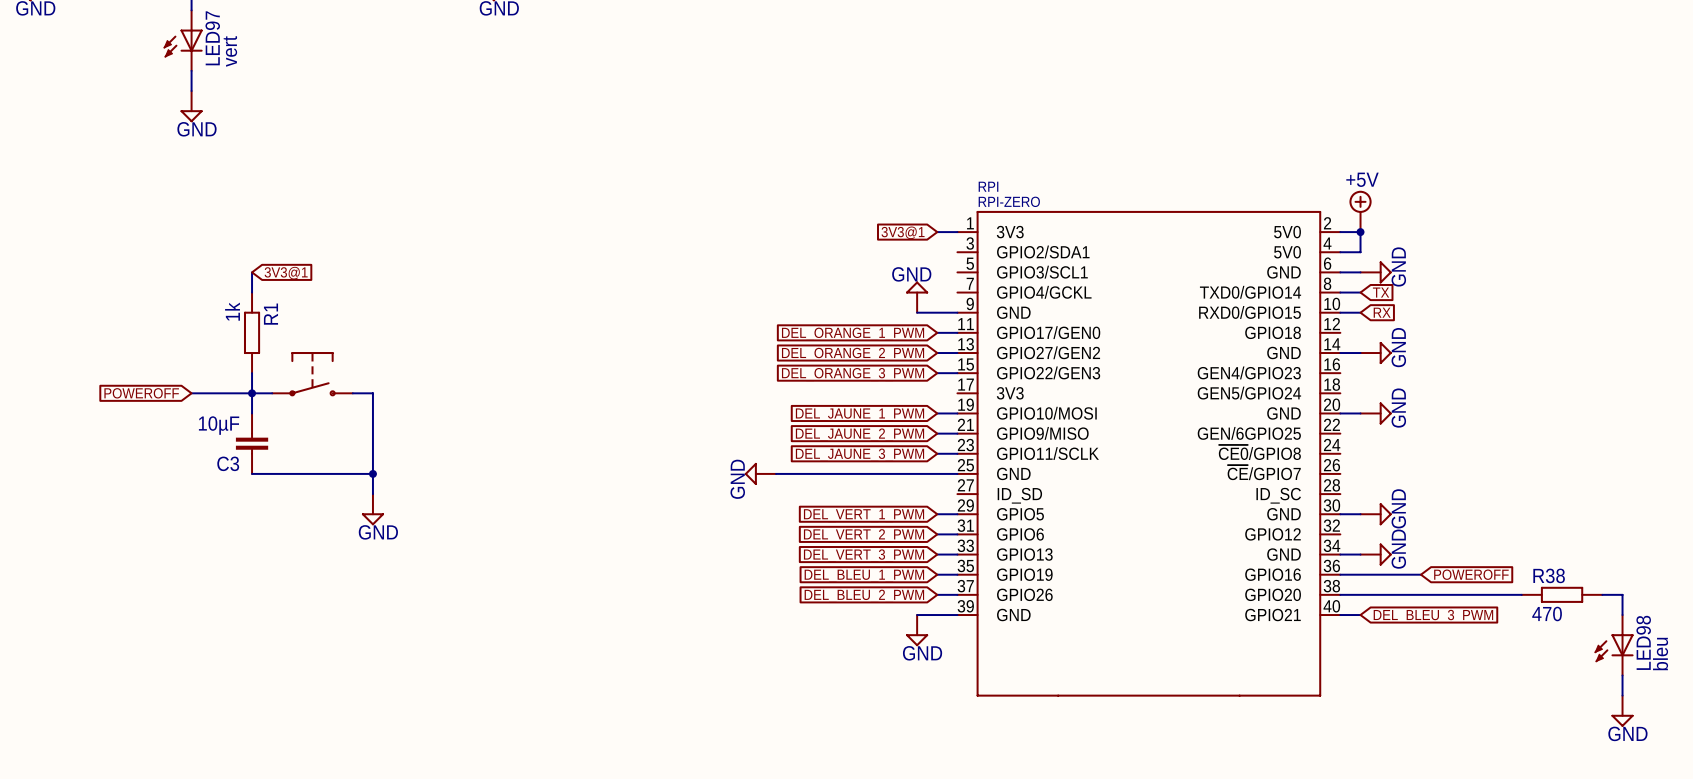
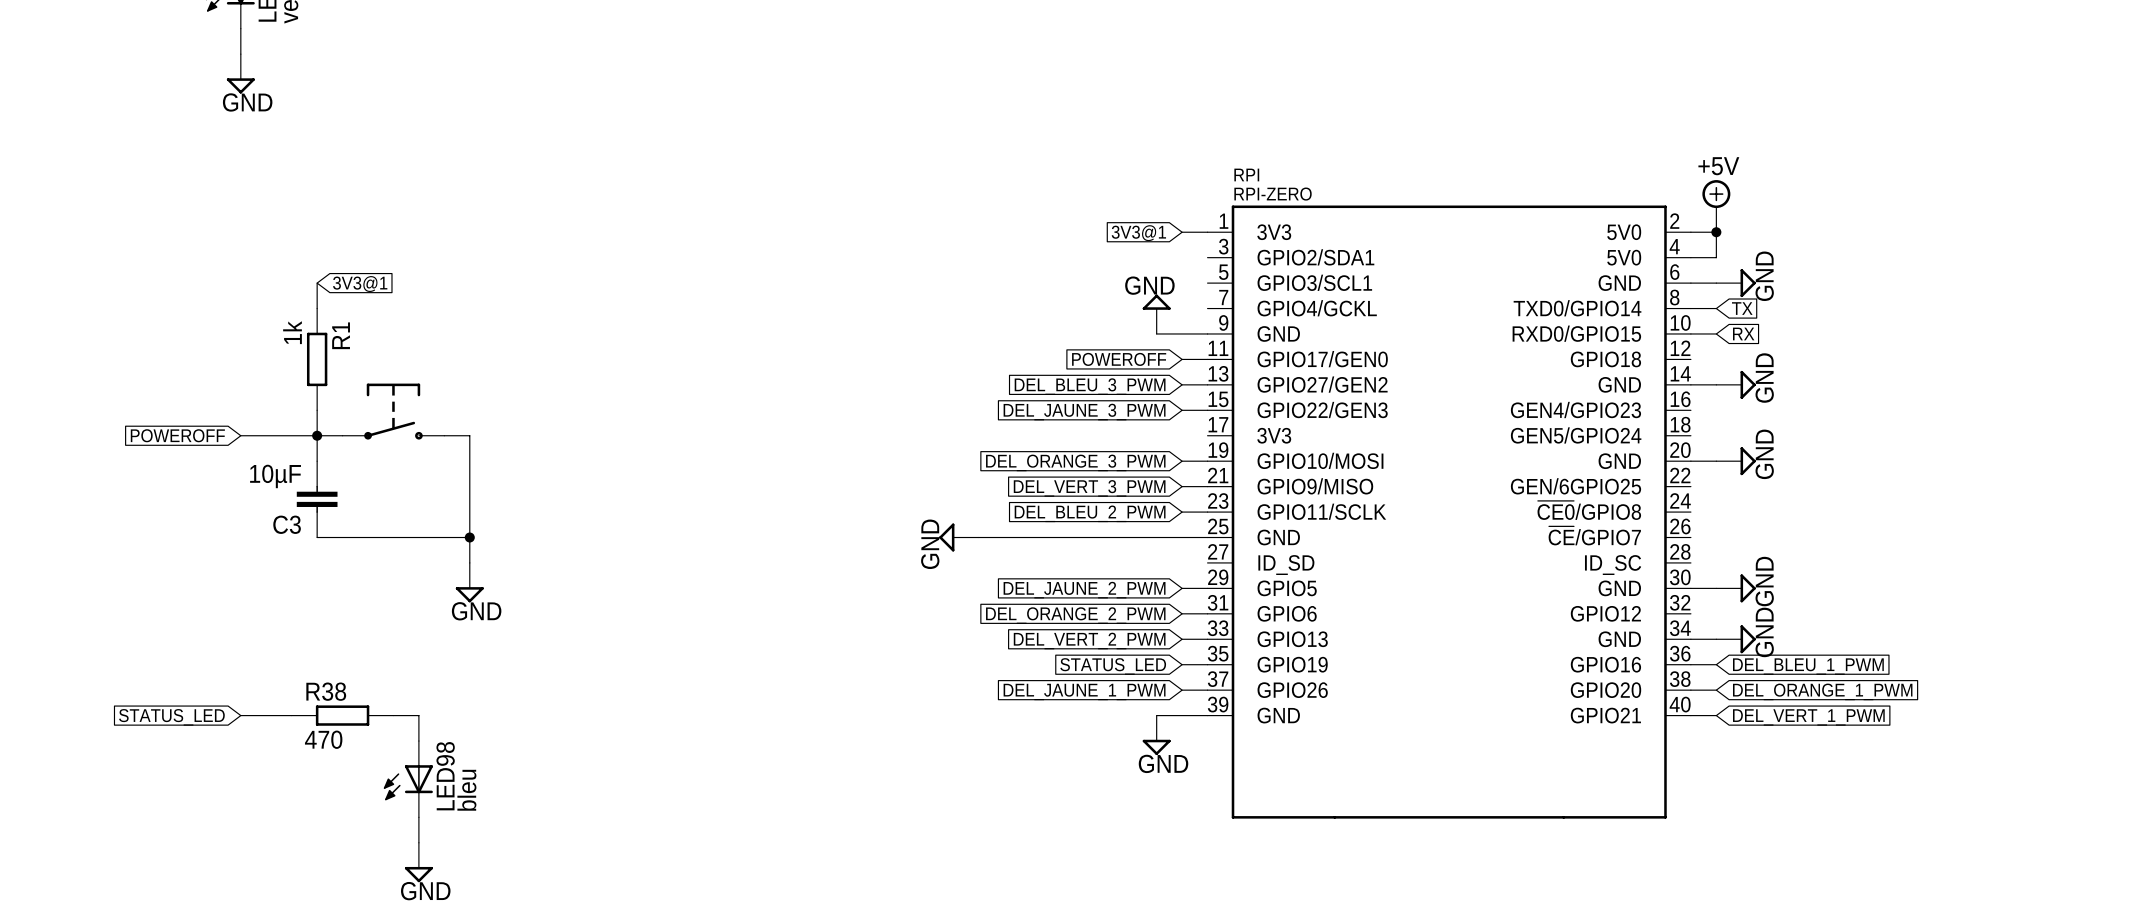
global label: DEL_ORANGE_1_PWM (853, 334) -> POWEROFF (1119, 359)
global label: DEL_ORANGE_2_PWM (853, 354) -> DEL_BLEU_3_PWM (1090, 386)
global label: DEL_ORANGE_3_PWM (853, 374) -> DEL_JAUNE_3_PWM (1084, 412)
global label: DEL_JAUNE_1_PWM (859, 414) -> DEL_ORANGE_3_PWM (1075, 462)
global label: DEL_JAUNE_2_PWM (859, 435) -> DEL_VERT_3_PWM (1089, 488)
global label: DEL_JAUNE_3_PWM (859, 455) -> DEL_BLEU_2_PWM (1090, 513)
global label: DEL_VERT_1_PWM (864, 515) -> DEL_JAUNE_2_PWM (1084, 590)
global label: DEL_VERT_2_PWM (864, 535) -> DEL_ORANGE_2_PWM (1075, 615)
global label: DEL_VERT_3_PWM (864, 555) -> DEL_VERT_2_PWM (1089, 641)
wire: (1360, 574) (1420, 574) -> none
global label: POWEROFF (1471, 574) -> none
global label: DEL_BLEU_1_PWM (864, 576) -> STATUS_LED (1113, 666)
global label: none -> DEL_BLEU_1_PWM (1808, 666)
wire: (1360, 594) (1521, 594) -> none
R38 position: (1562, 594) -> (342, 715)
wire: (1602, 594) (1622, 594) (1622, 615) -> none
global label: DEL_BLEU_2_PWM (864, 596) -> DEL_JAUNE_1_PWM (1084, 691)
global label: none -> DEL_ORANGE_1_PWM (1822, 691)
wire: none -> (240, 715) (291, 715)
wire: none -> (393, 715) (418, 715) (418, 741)
global label: none -> STATUS_LED (171, 717)
global label: DEL_BLEU_3_PWM (1433, 616) -> DEL_VERT_1_PWM (1808, 717)
LED98 position: (1614, 645) -> (408, 779)
wire: (1622, 675) (1622, 695) -> none
wire: none -> (418, 817) (418, 842)
power symbol: GND (1622, 711) -> none
power symbol: none -> GND (418, 862)

